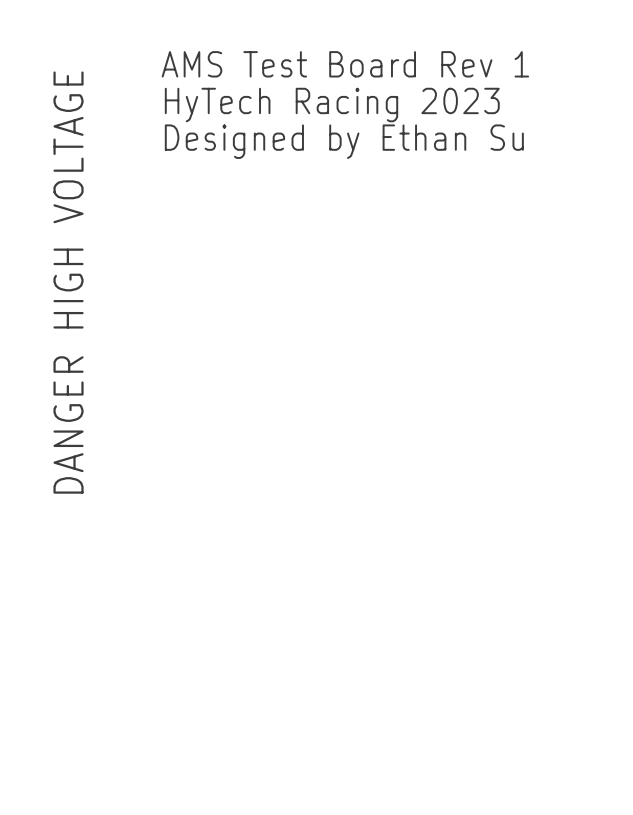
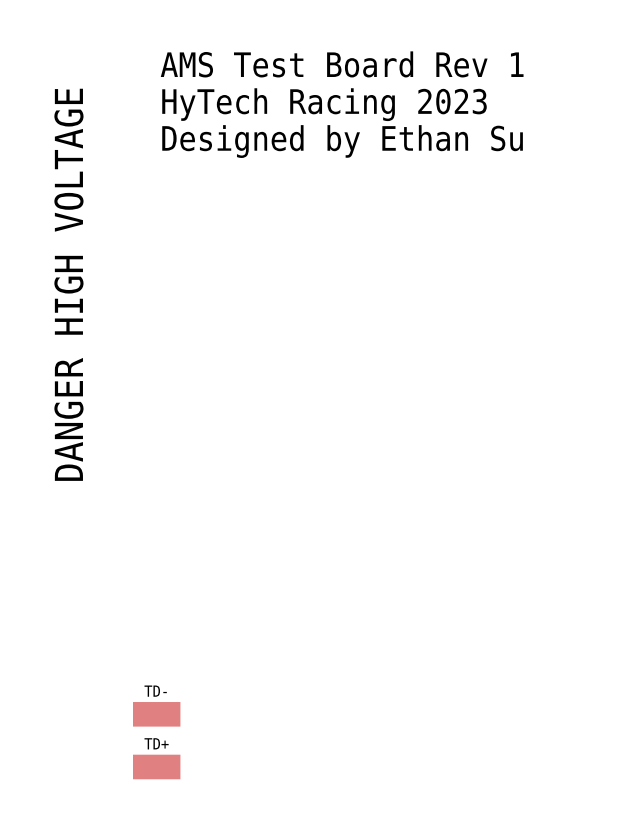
TD-: none -> (156, 714)
TD+: none -> (156, 766)

